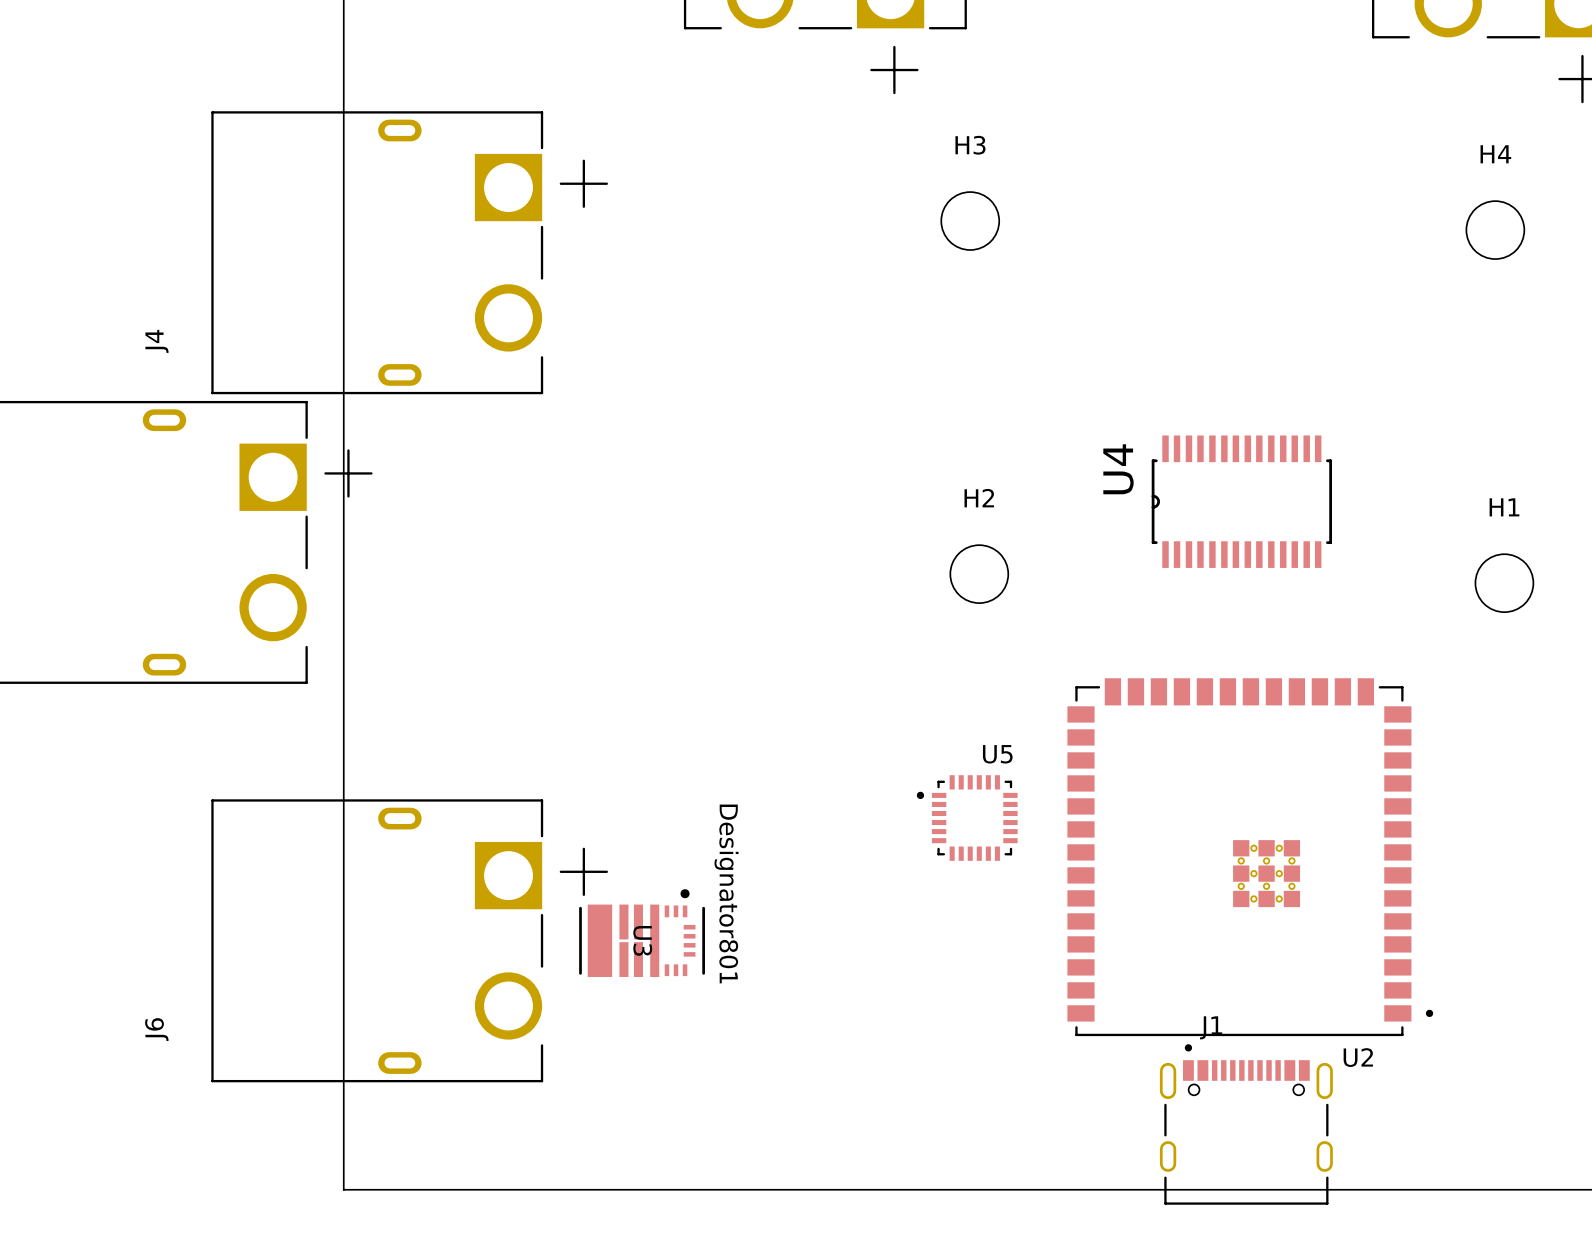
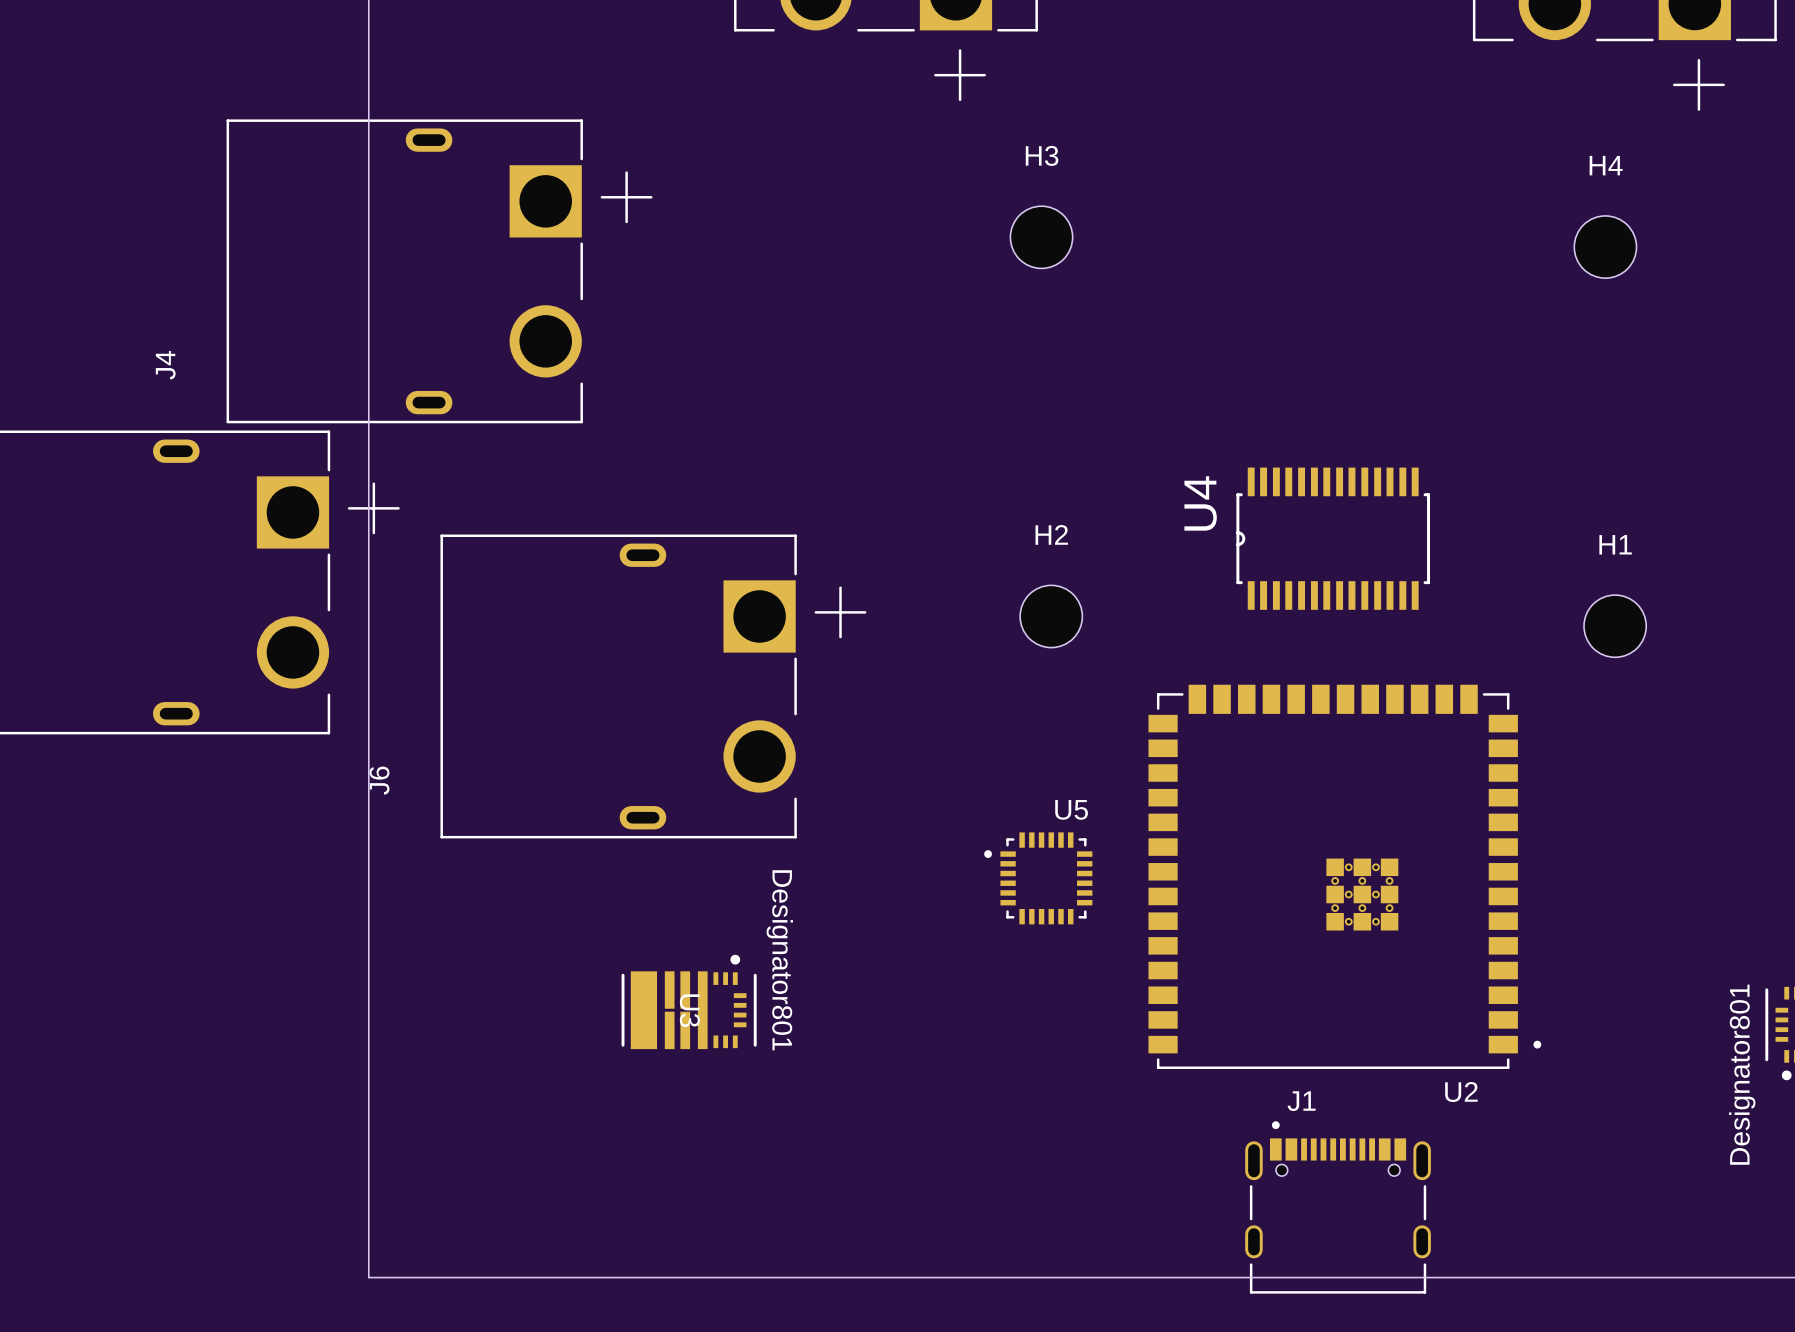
U2 position: (1250, 857) -> (1344, 876)
J6 position: (409, 940) -> (653, 686)

